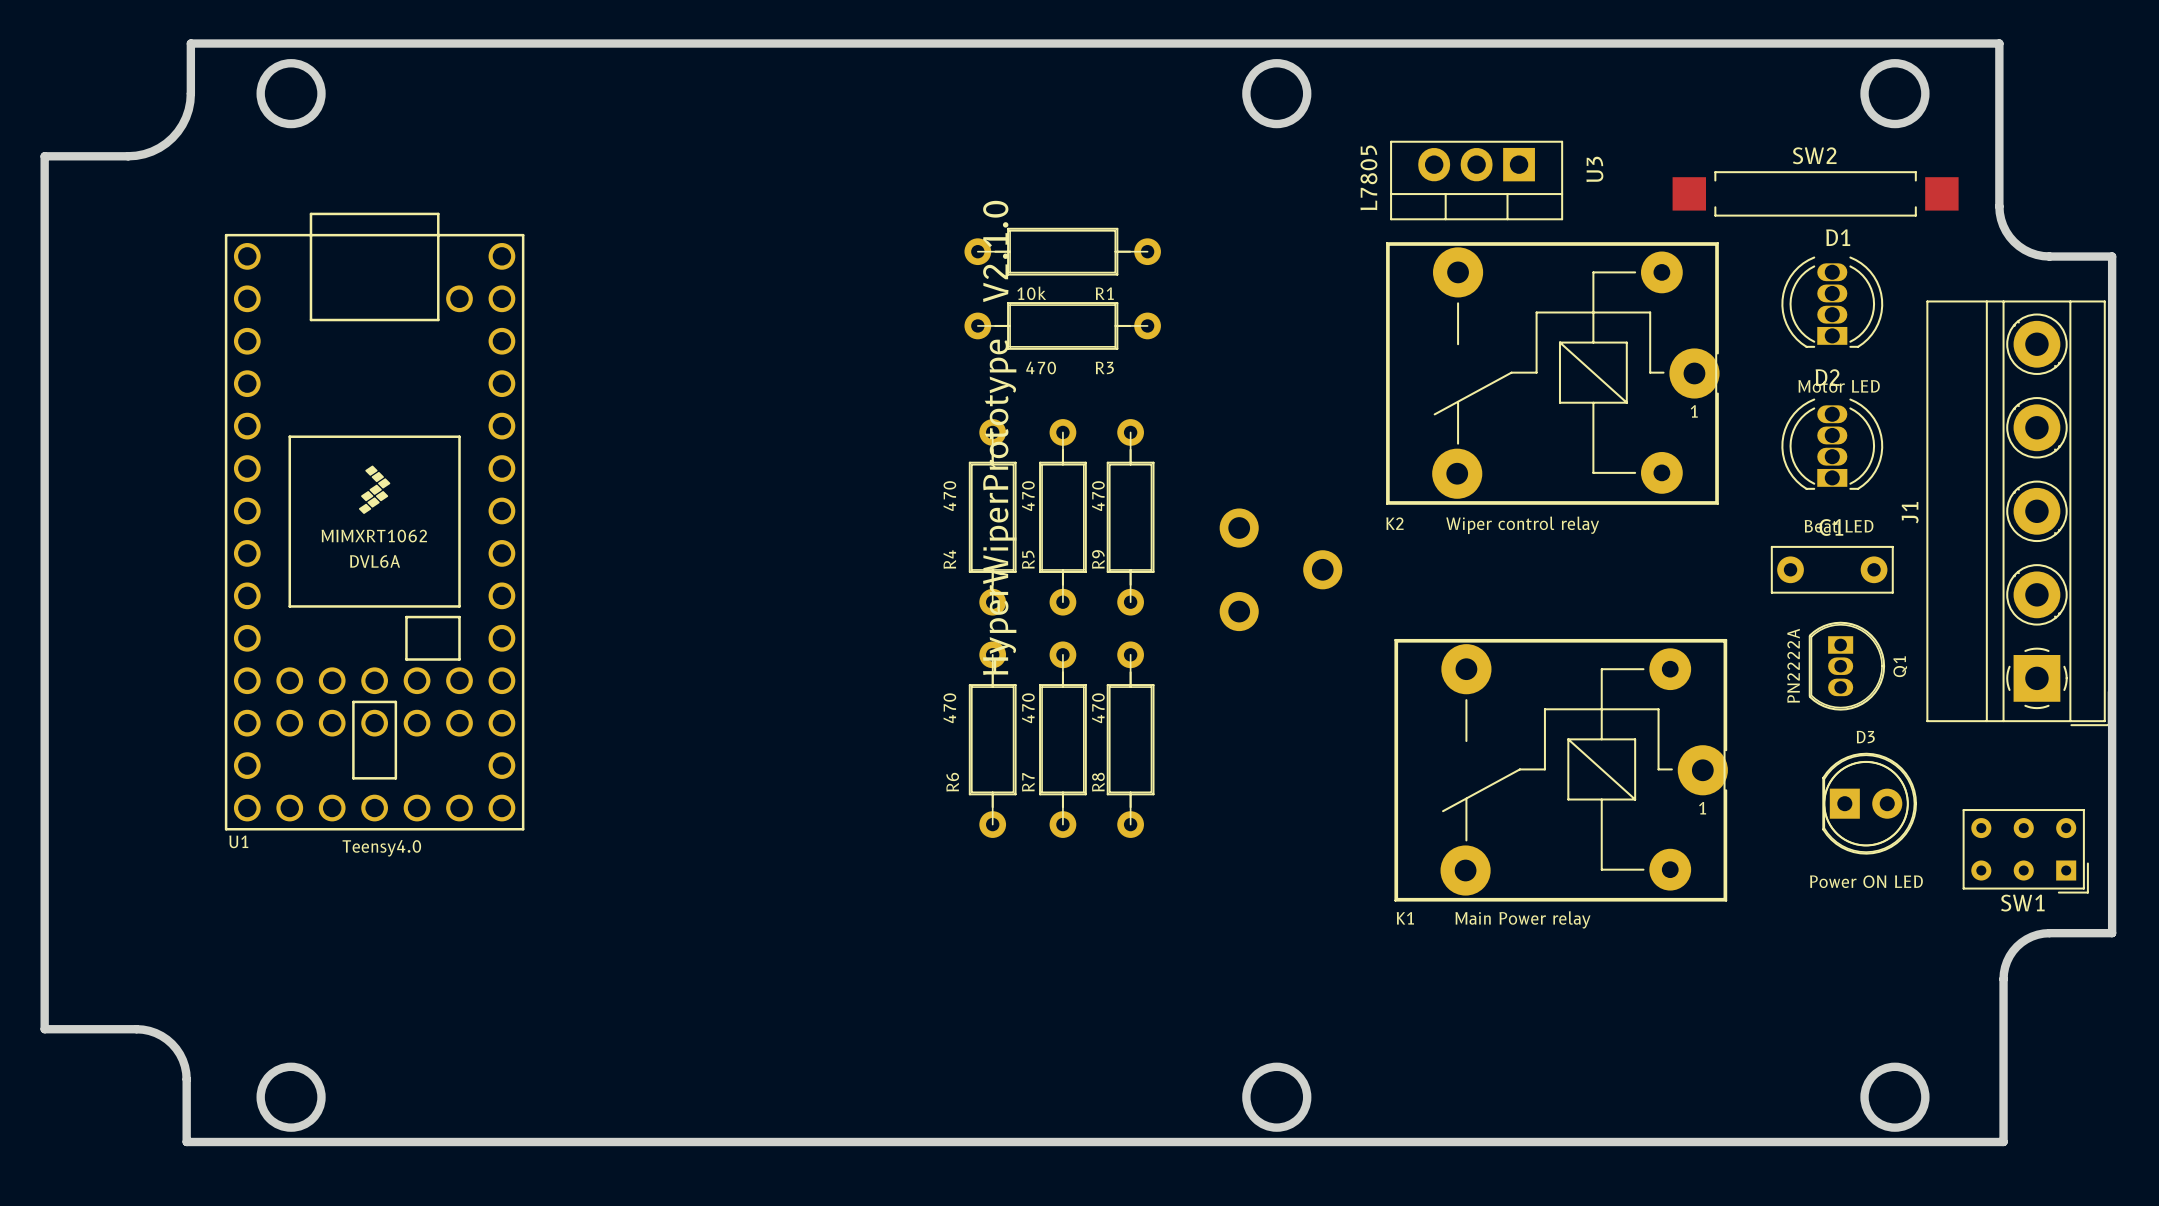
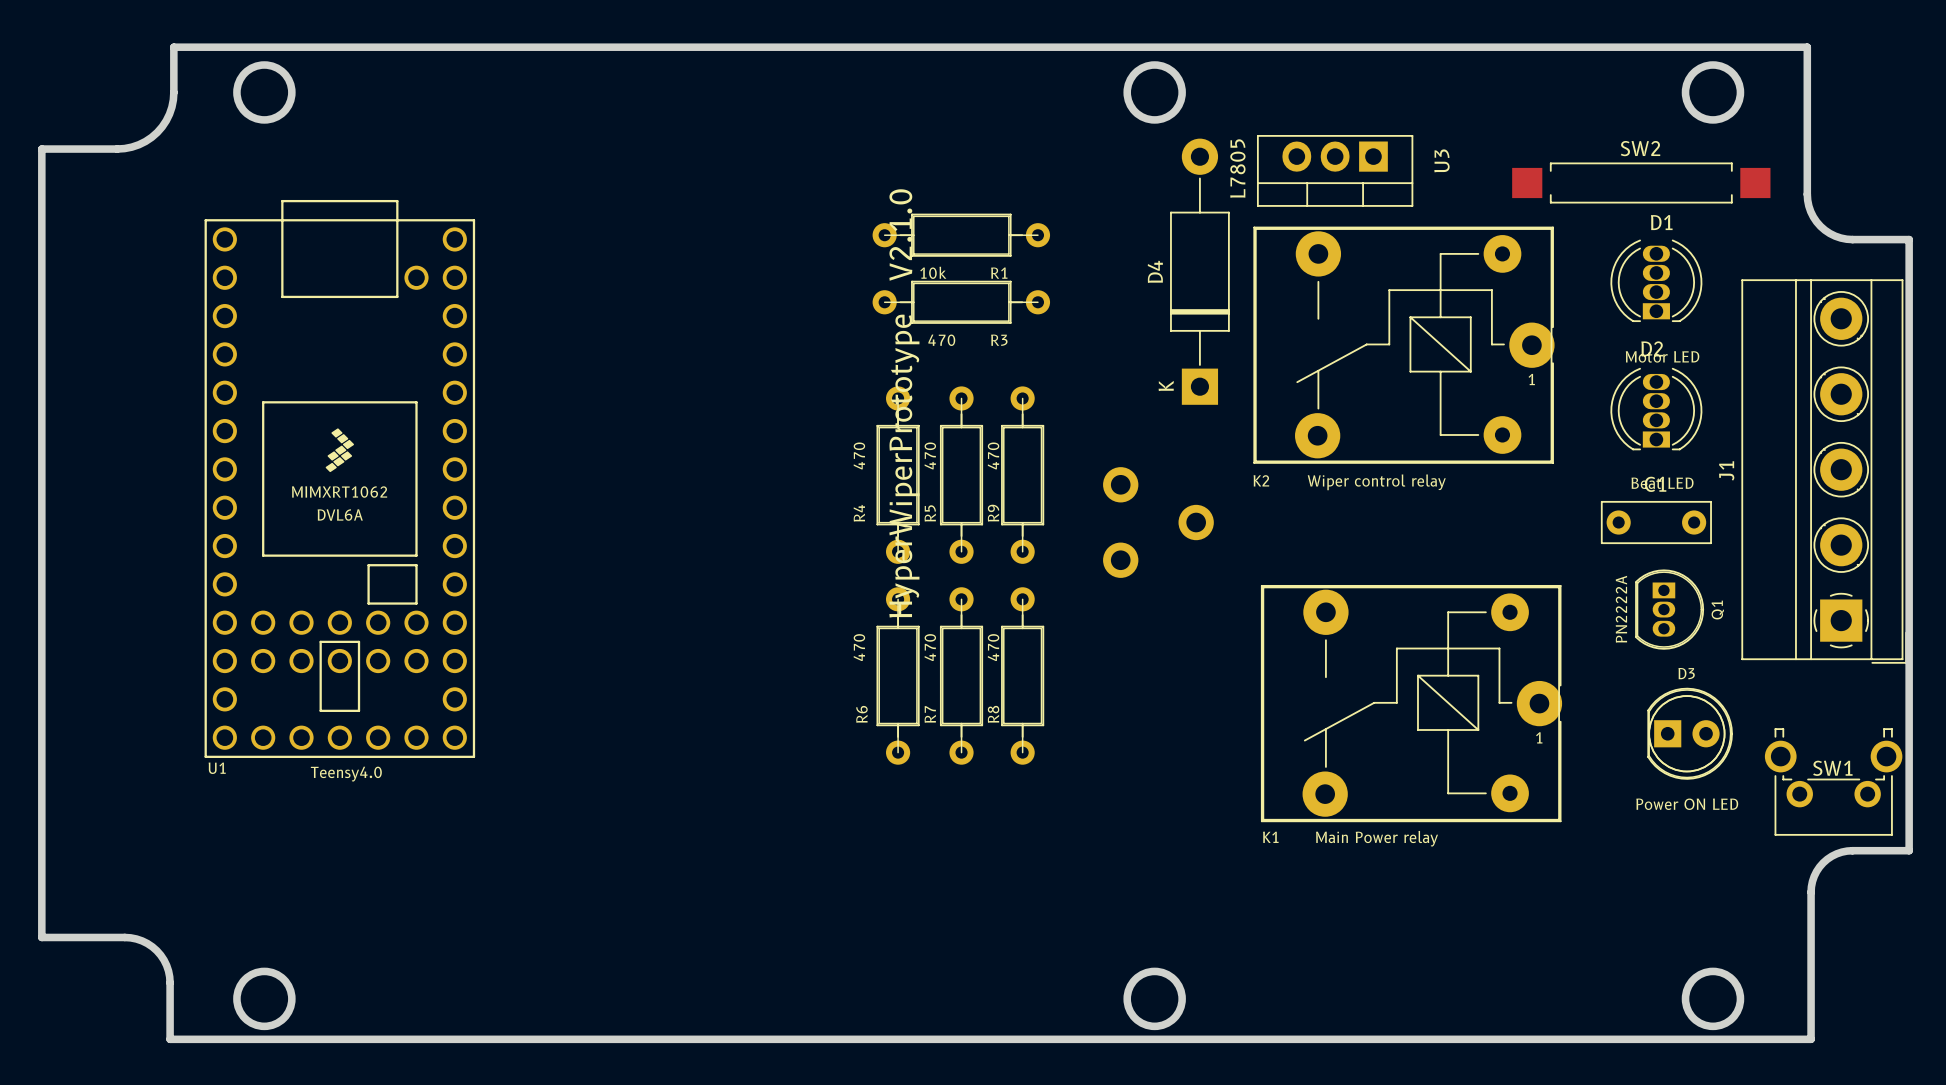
D4: none -> (1199, 271)
SW1 footprint: [1962, 809, 2089, 894] -> [1764, 728, 1903, 836]
SW1 name position: SW1 (2022, 903) -> SW1 (1832, 768)

